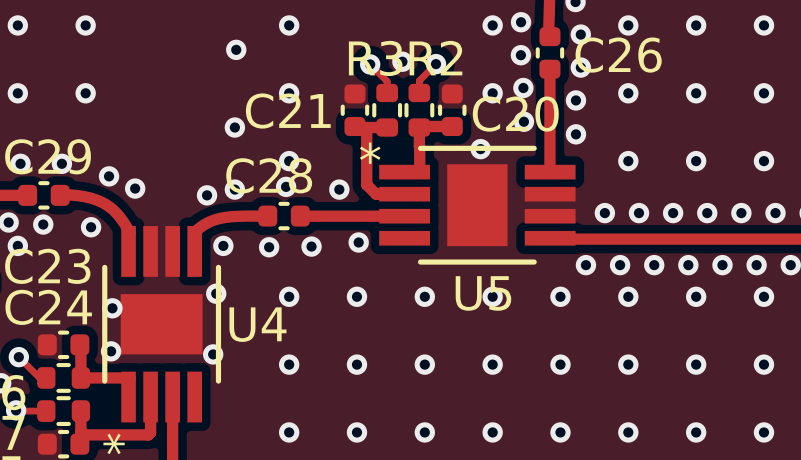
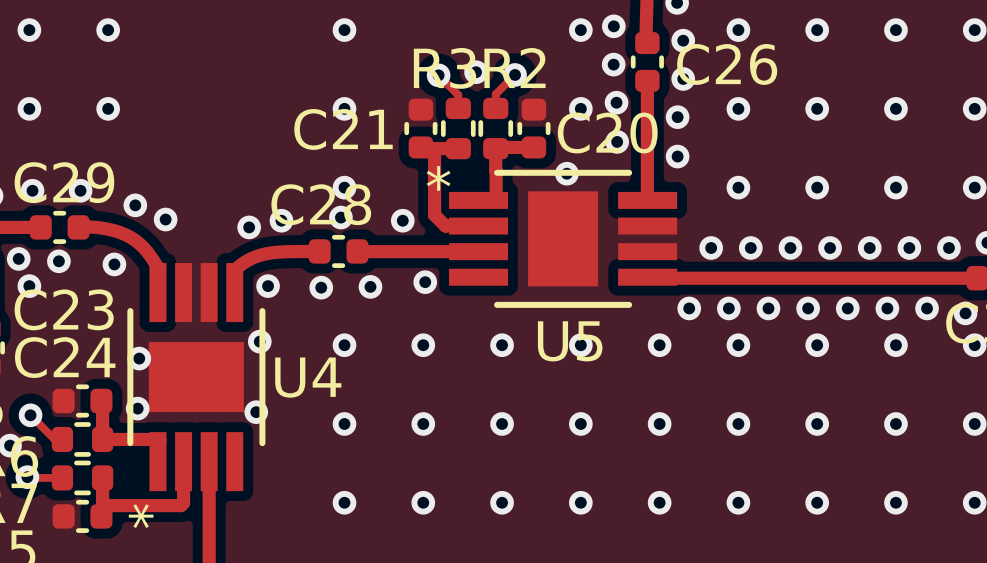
via: (236, 49) -> none
via: (234, 127) -> none

